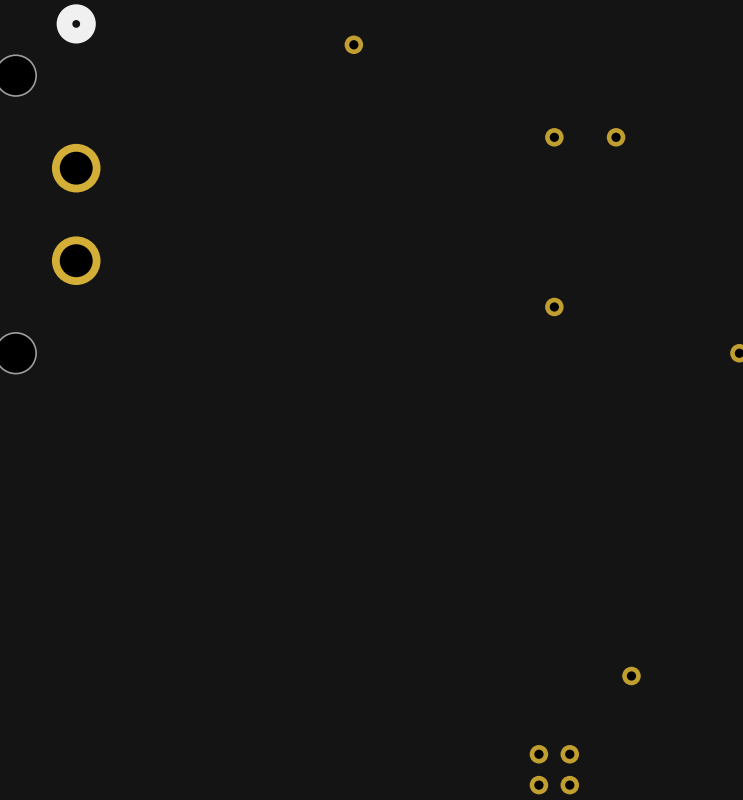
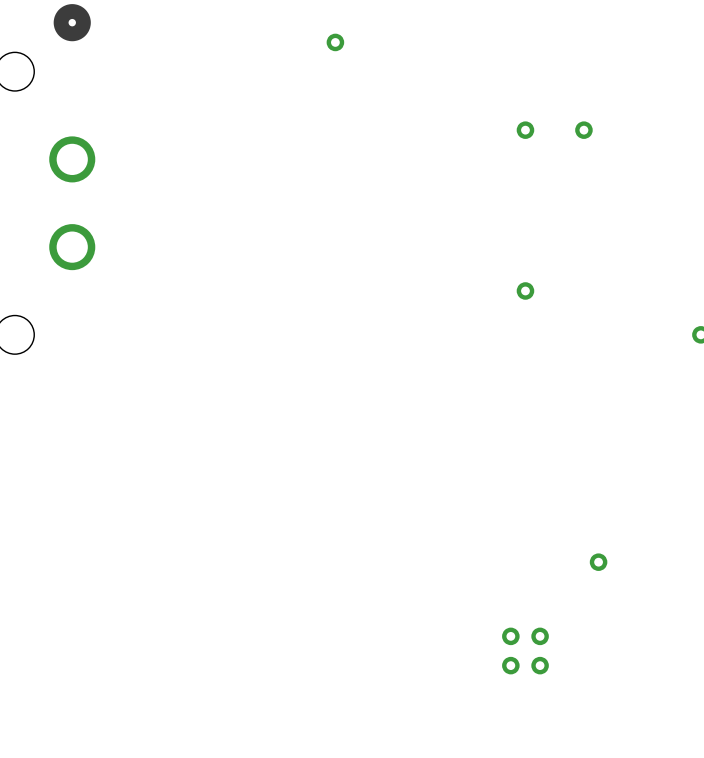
via: none -> (598, 562)
via: none -> (510, 636)
via: none -> (540, 636)
via: (631, 675) -> none
via: none -> (510, 665)
via: none -> (540, 665)
via: (538, 754) -> none
via: (569, 754) -> none
via: (538, 785) -> none
via: (569, 785) -> none

